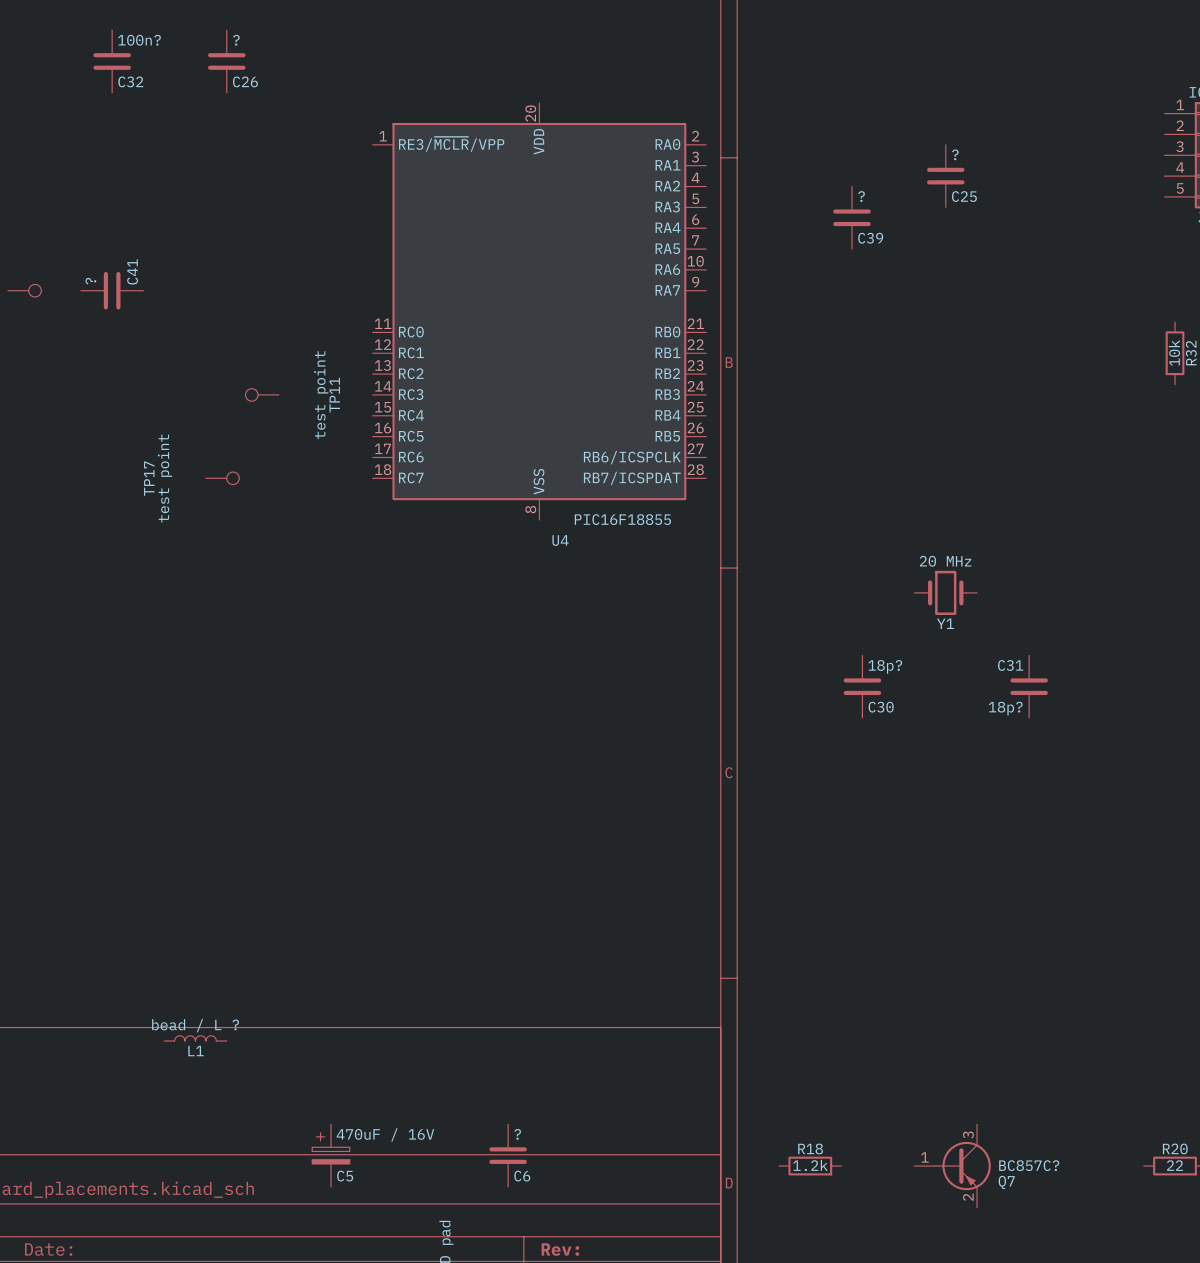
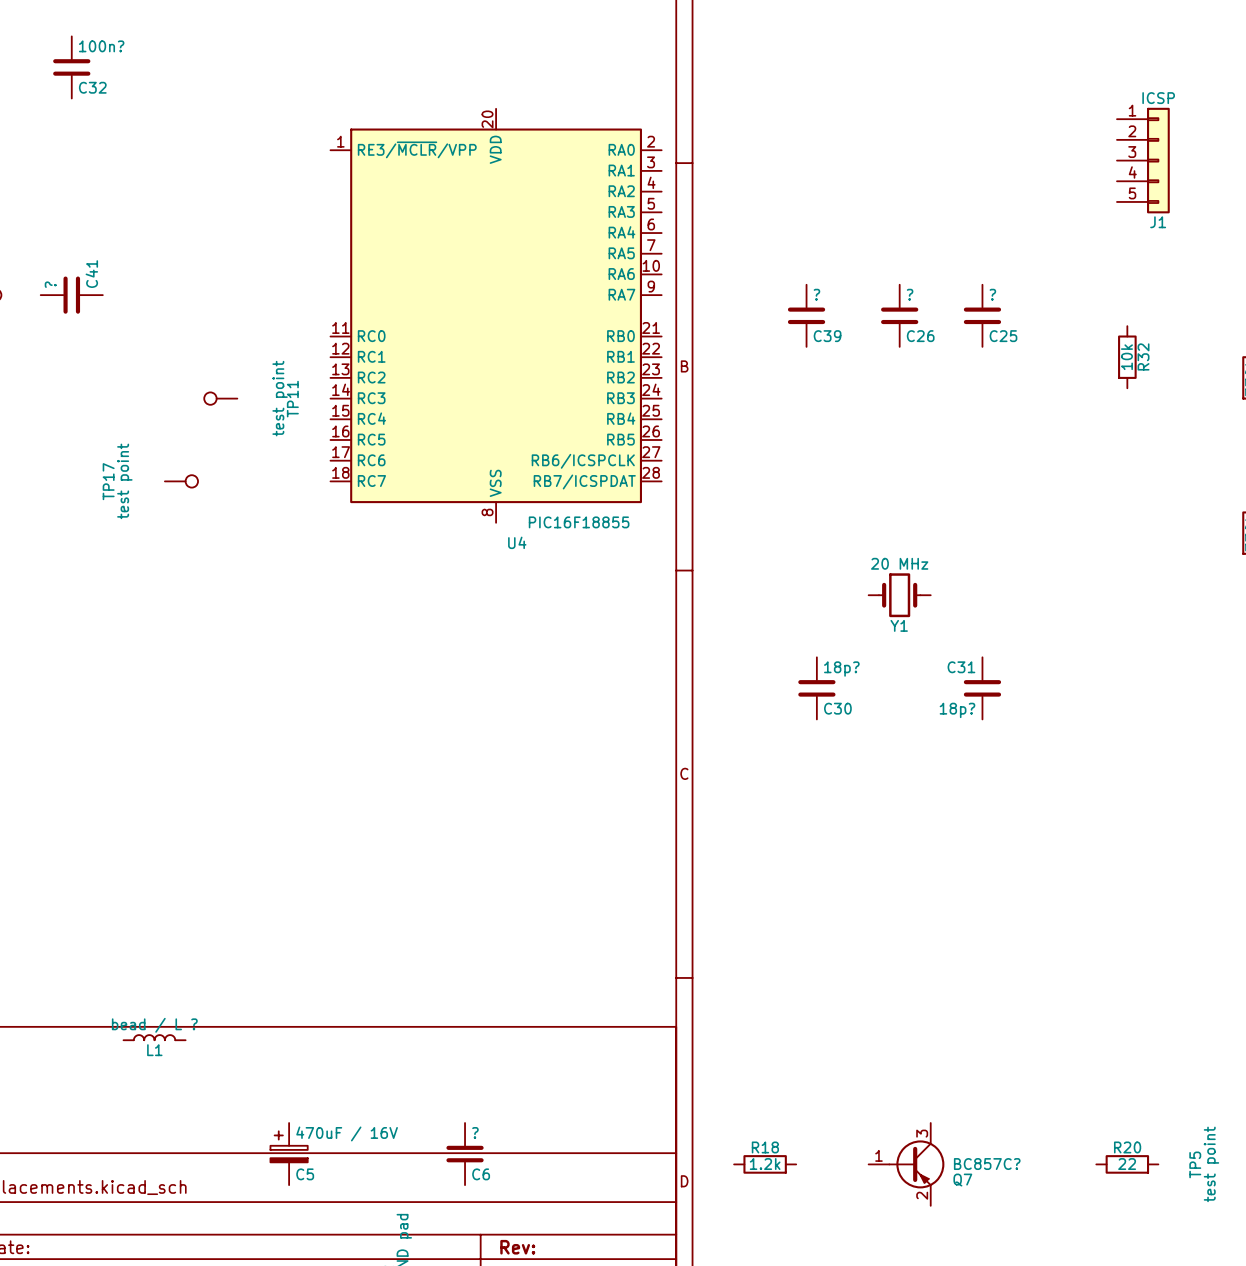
C26 position: (226, 61) -> (899, 315)
C25 position: (945, 176) -> (982, 315)
C39 position: (851, 217) -> (806, 315)

